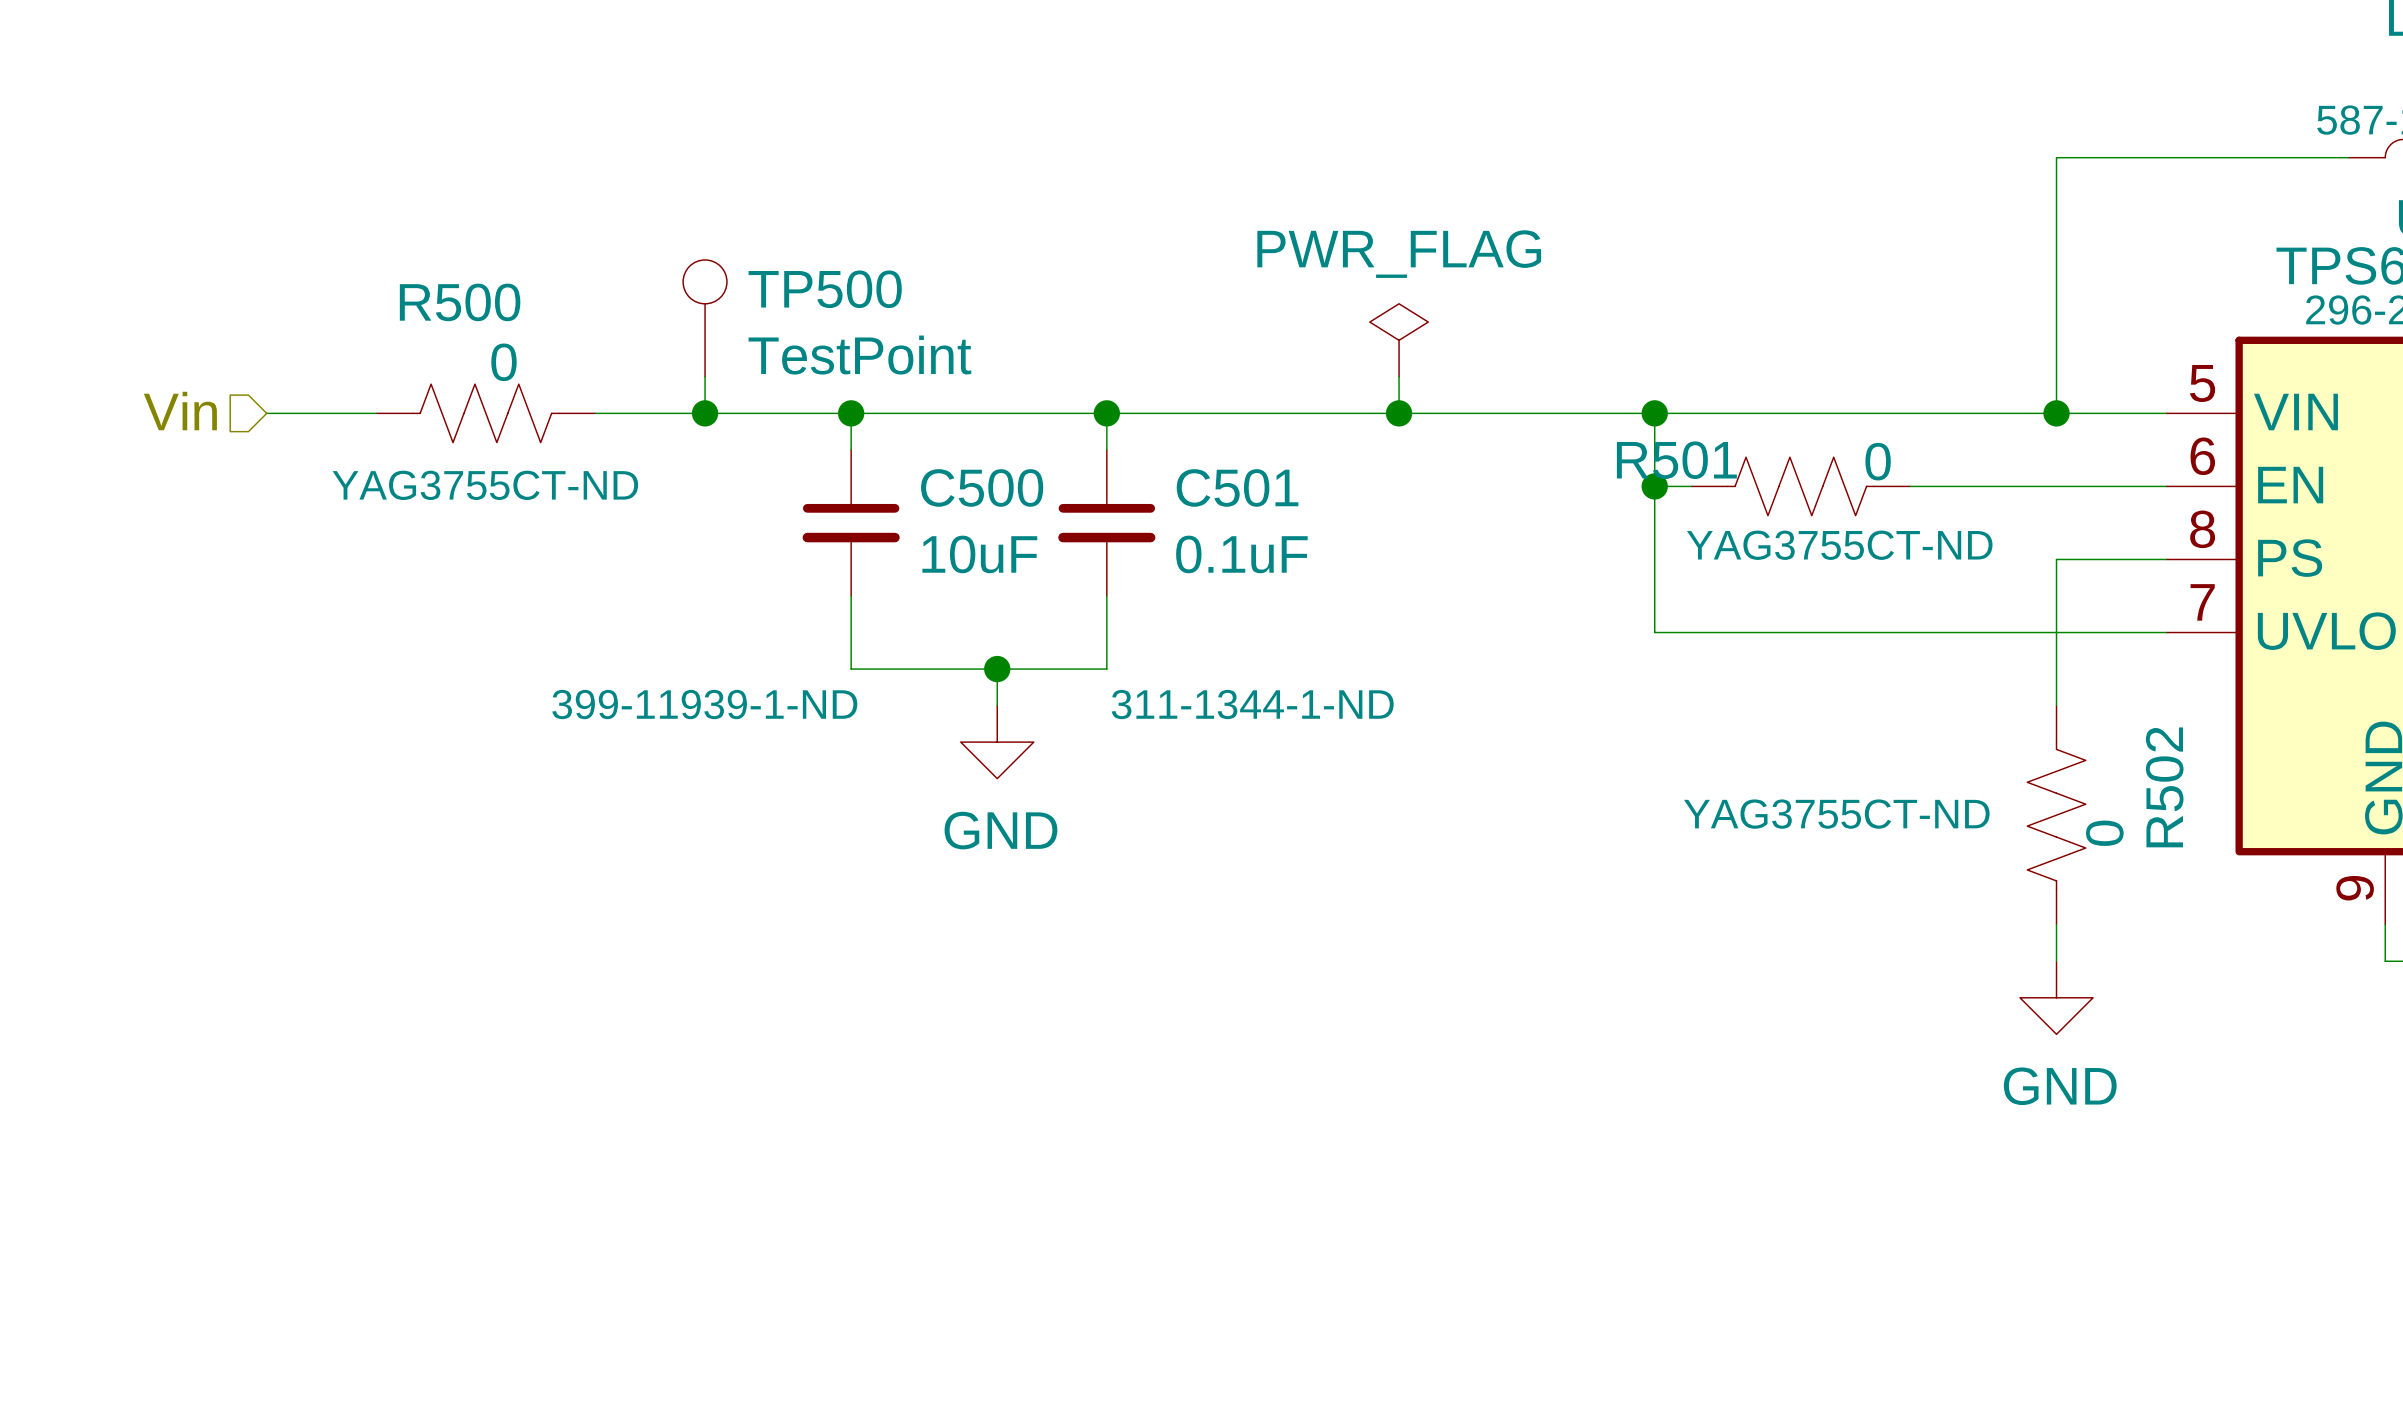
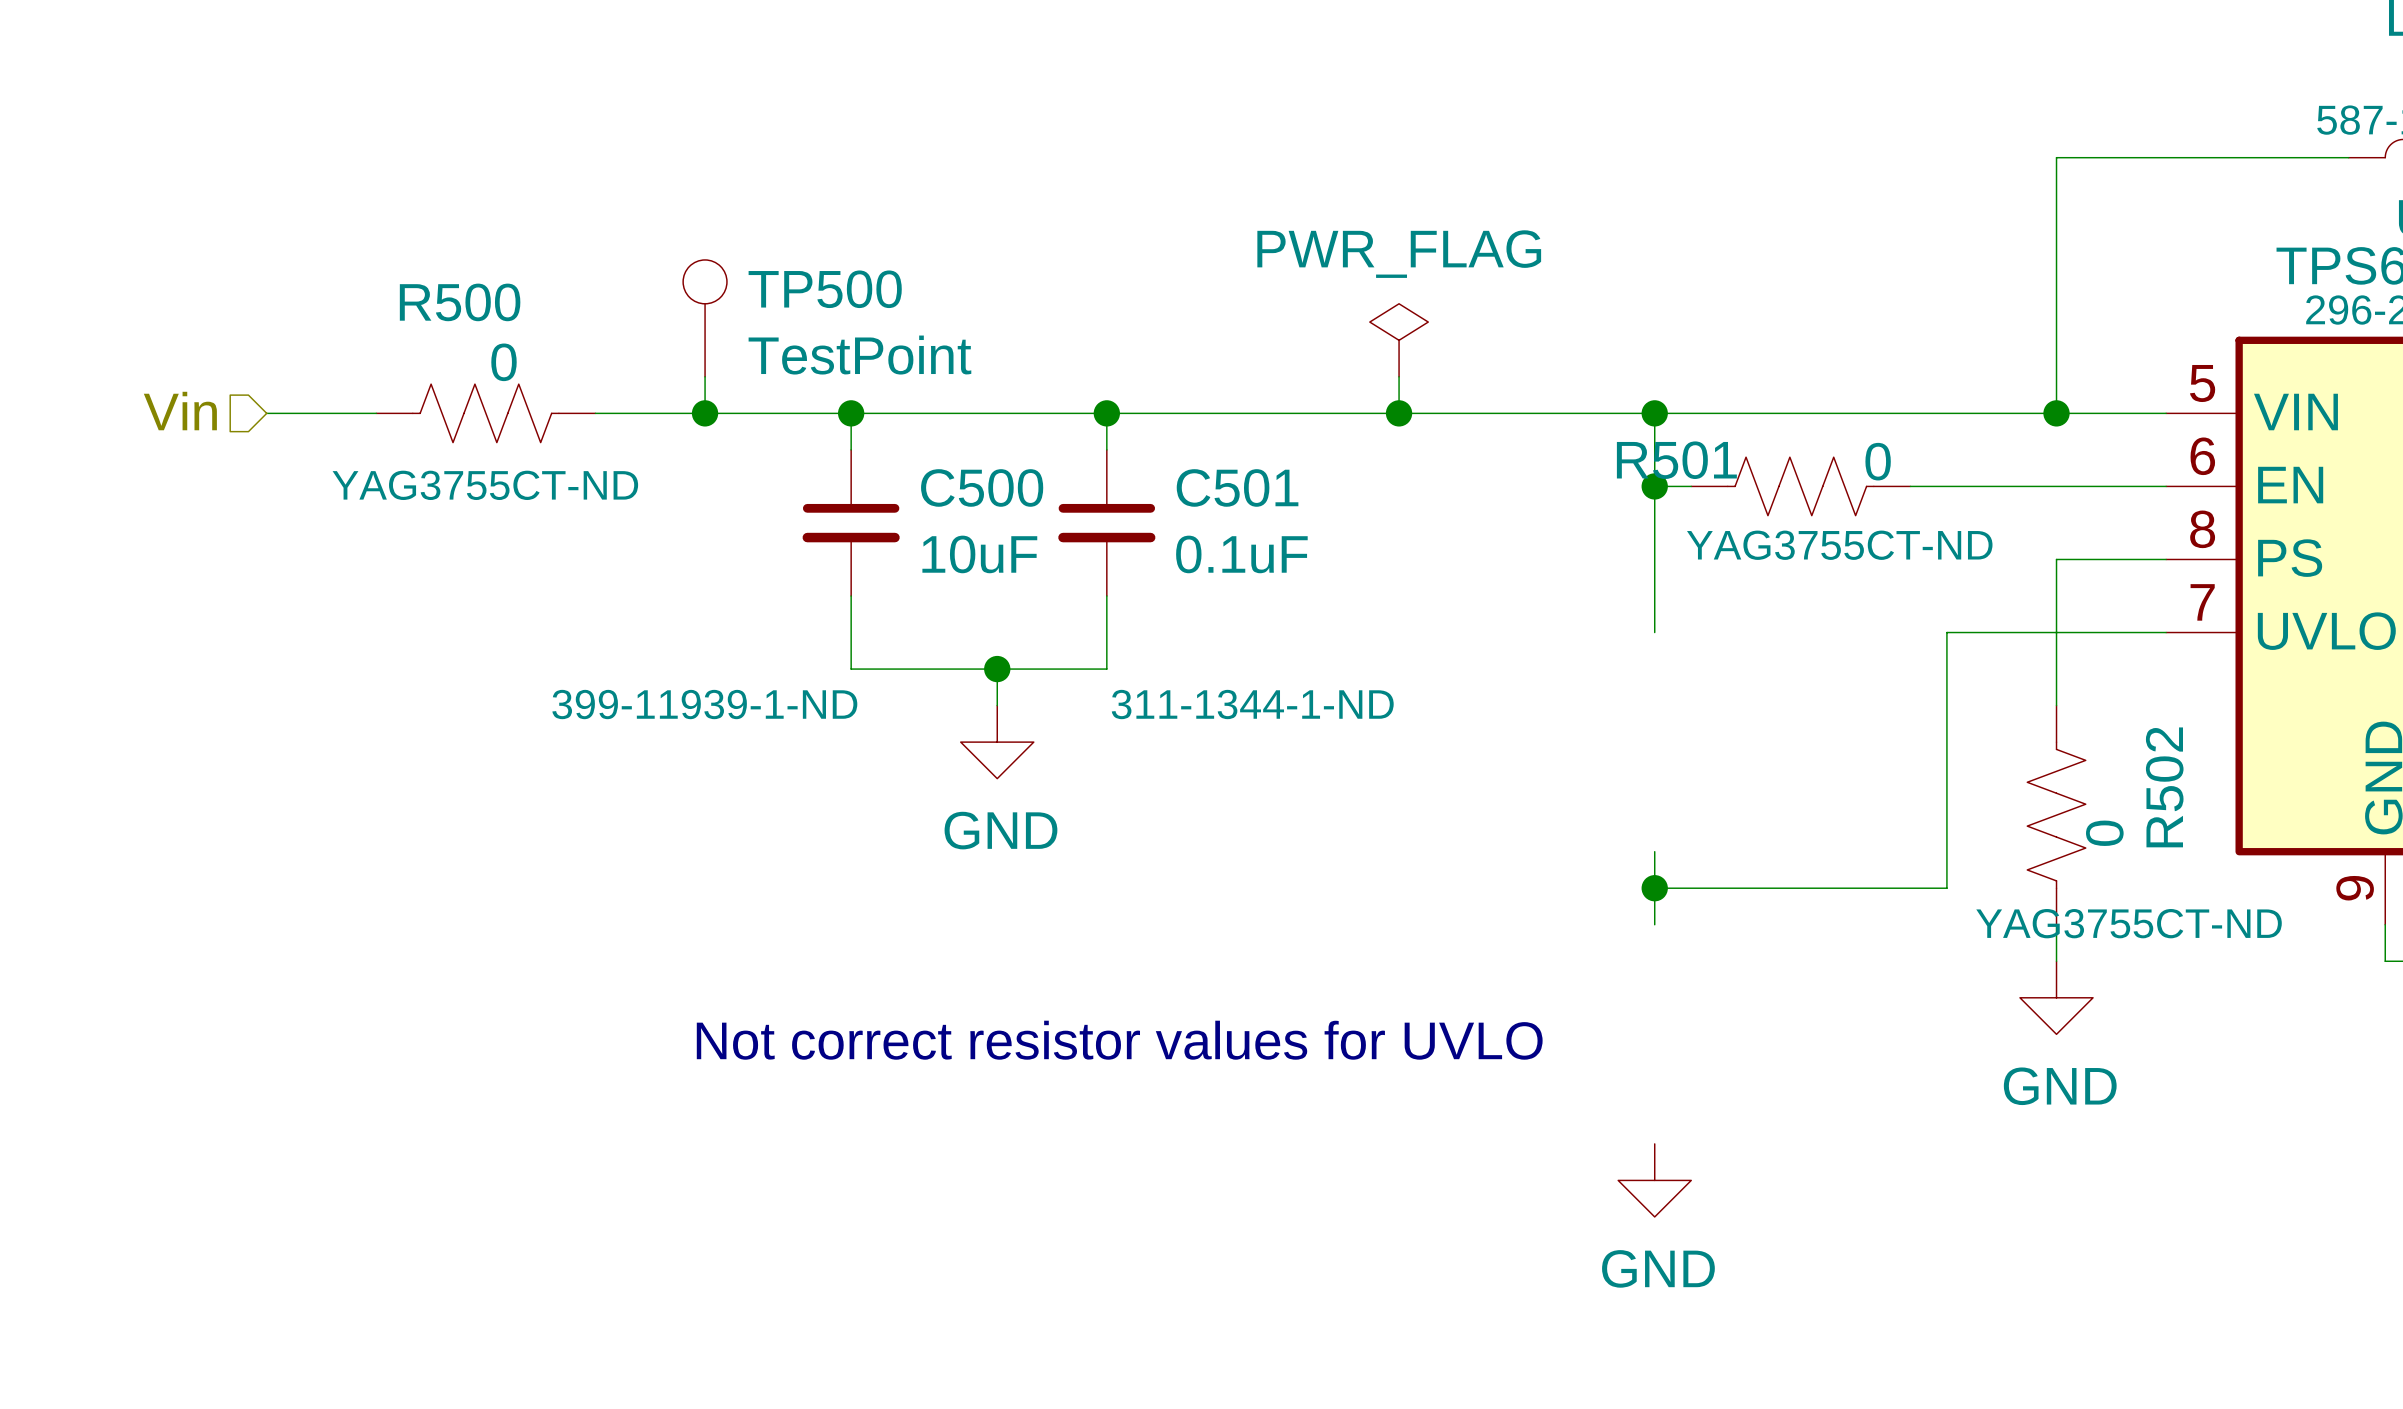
wire: (1654, 632) (1946, 632) -> (1654, 888) (1946, 888) (1946, 632)
R502 text position: YAG3755CT-ND (1836, 814) -> YAG3755CT-ND (2129, 923)
wire: none -> (1654, 851) (1654, 924)
junction: none -> (1654, 888)
text: none -> Not correct resistor values for UVLO (1119, 1040)
power symbol: none -> GND (1654, 1180)

